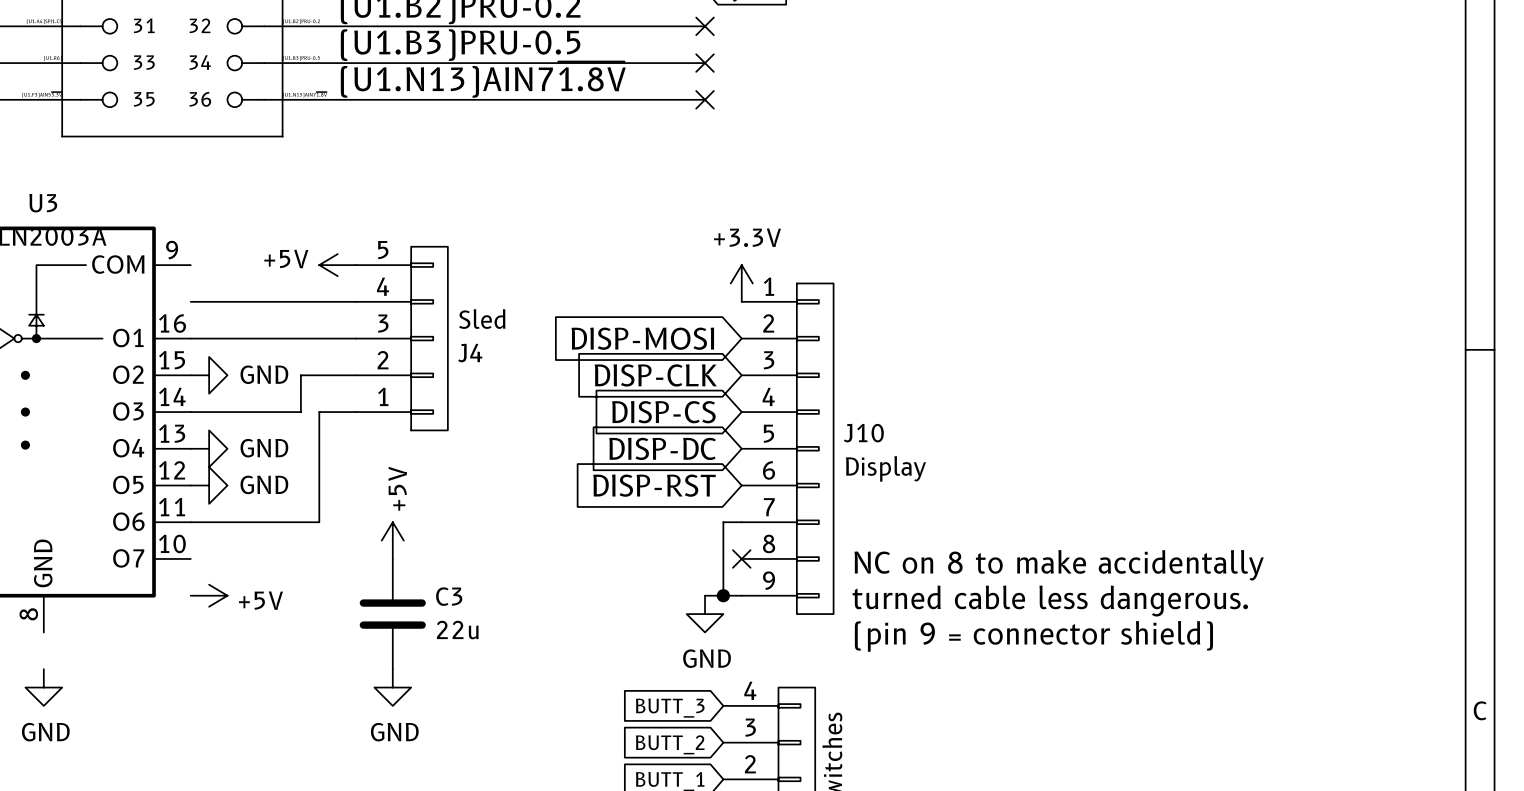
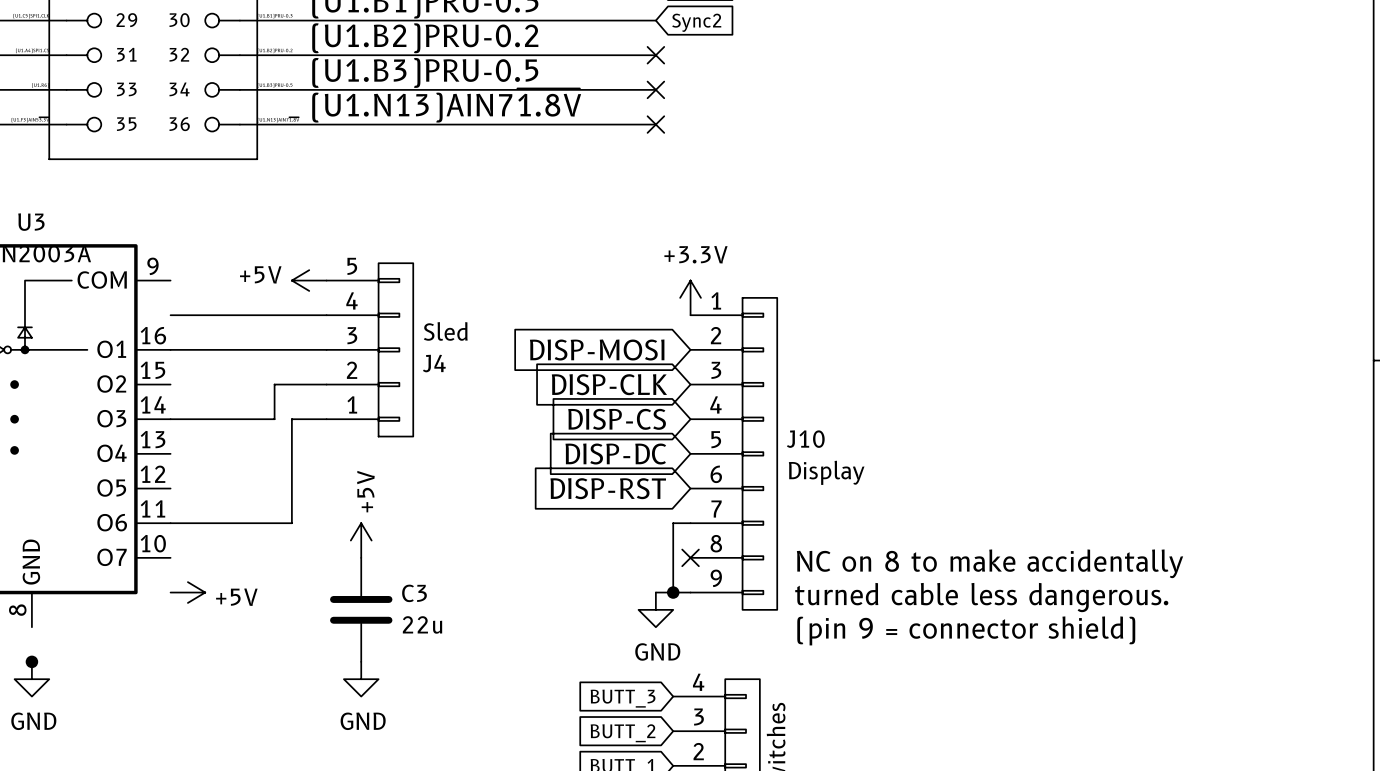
power symbol: GND (209, 375) -> none
power symbol: GND (209, 448) -> none
power symbol: GND (209, 485) -> none
junction: none -> (31, 661)

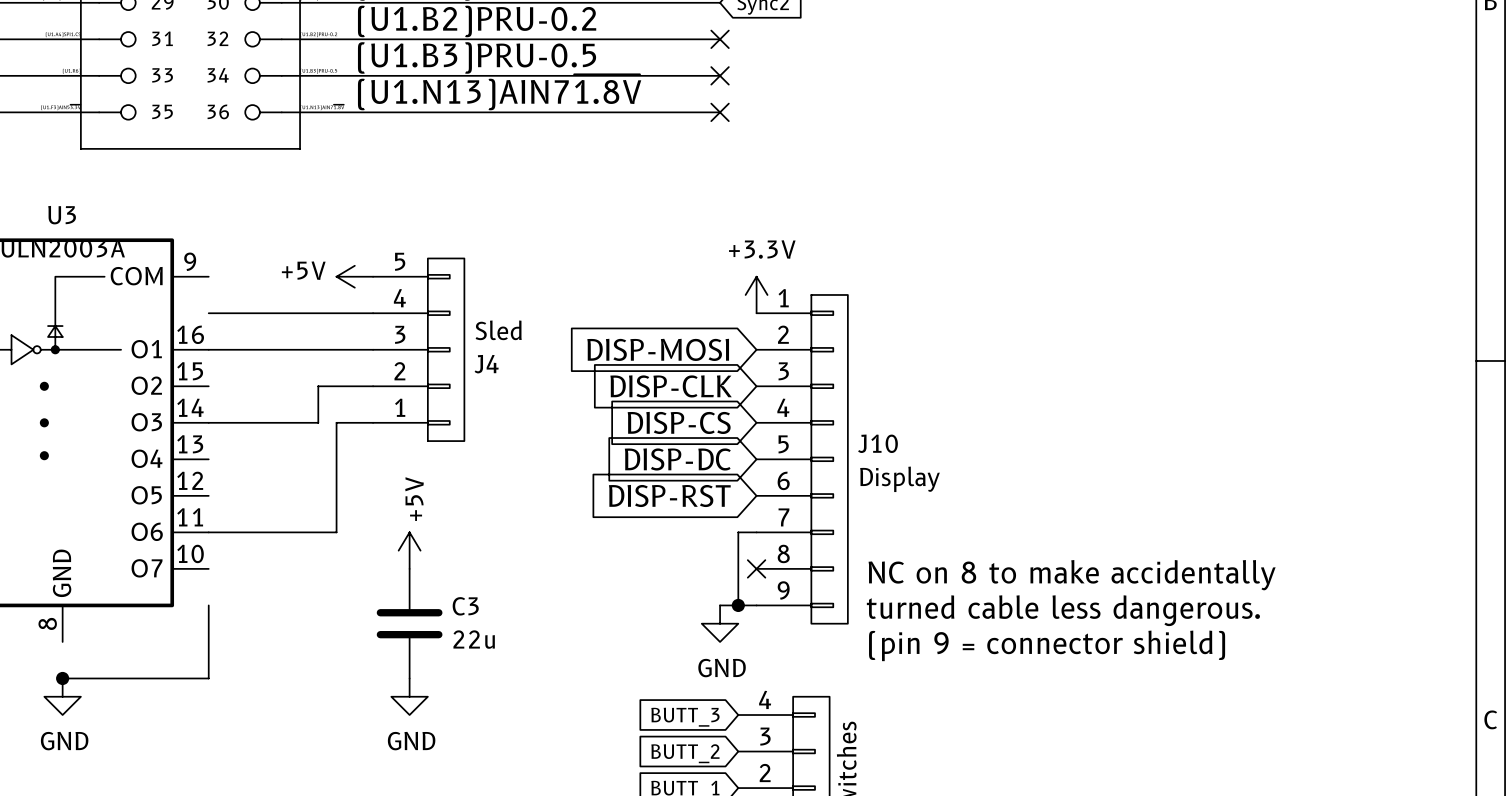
wire: none -> (208, 605) (208, 678) (62, 678)
power symbol: +5V (187, 592) -> none

